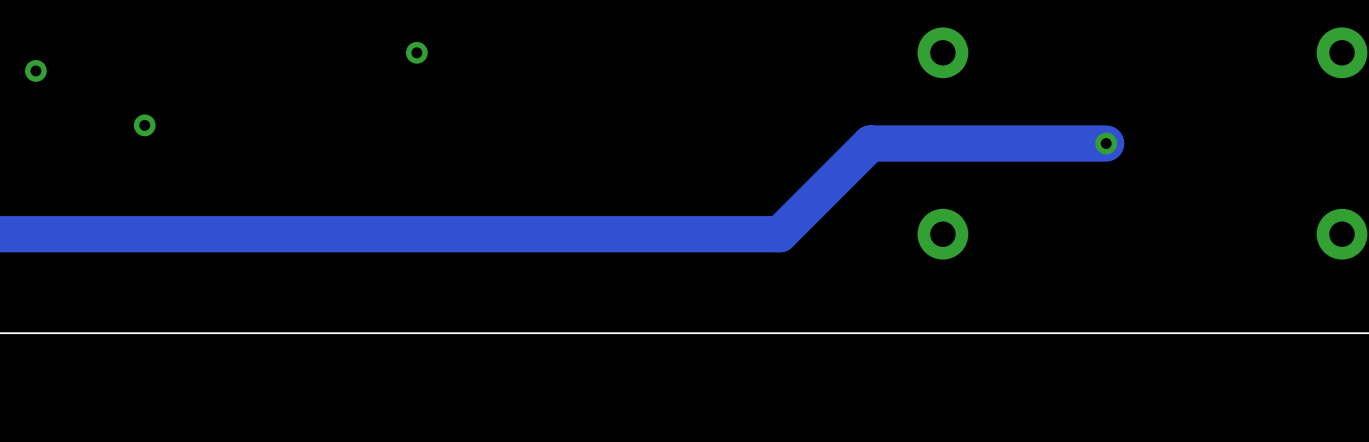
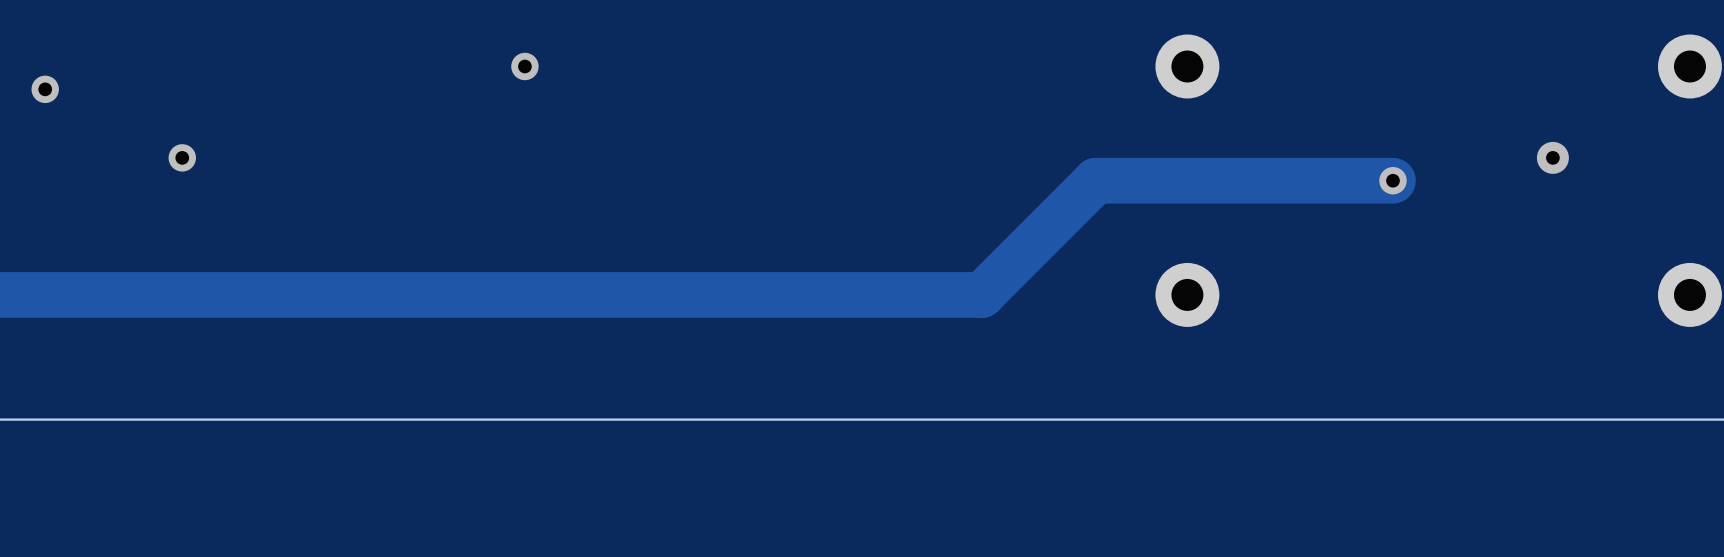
via: none -> (1552, 157)

